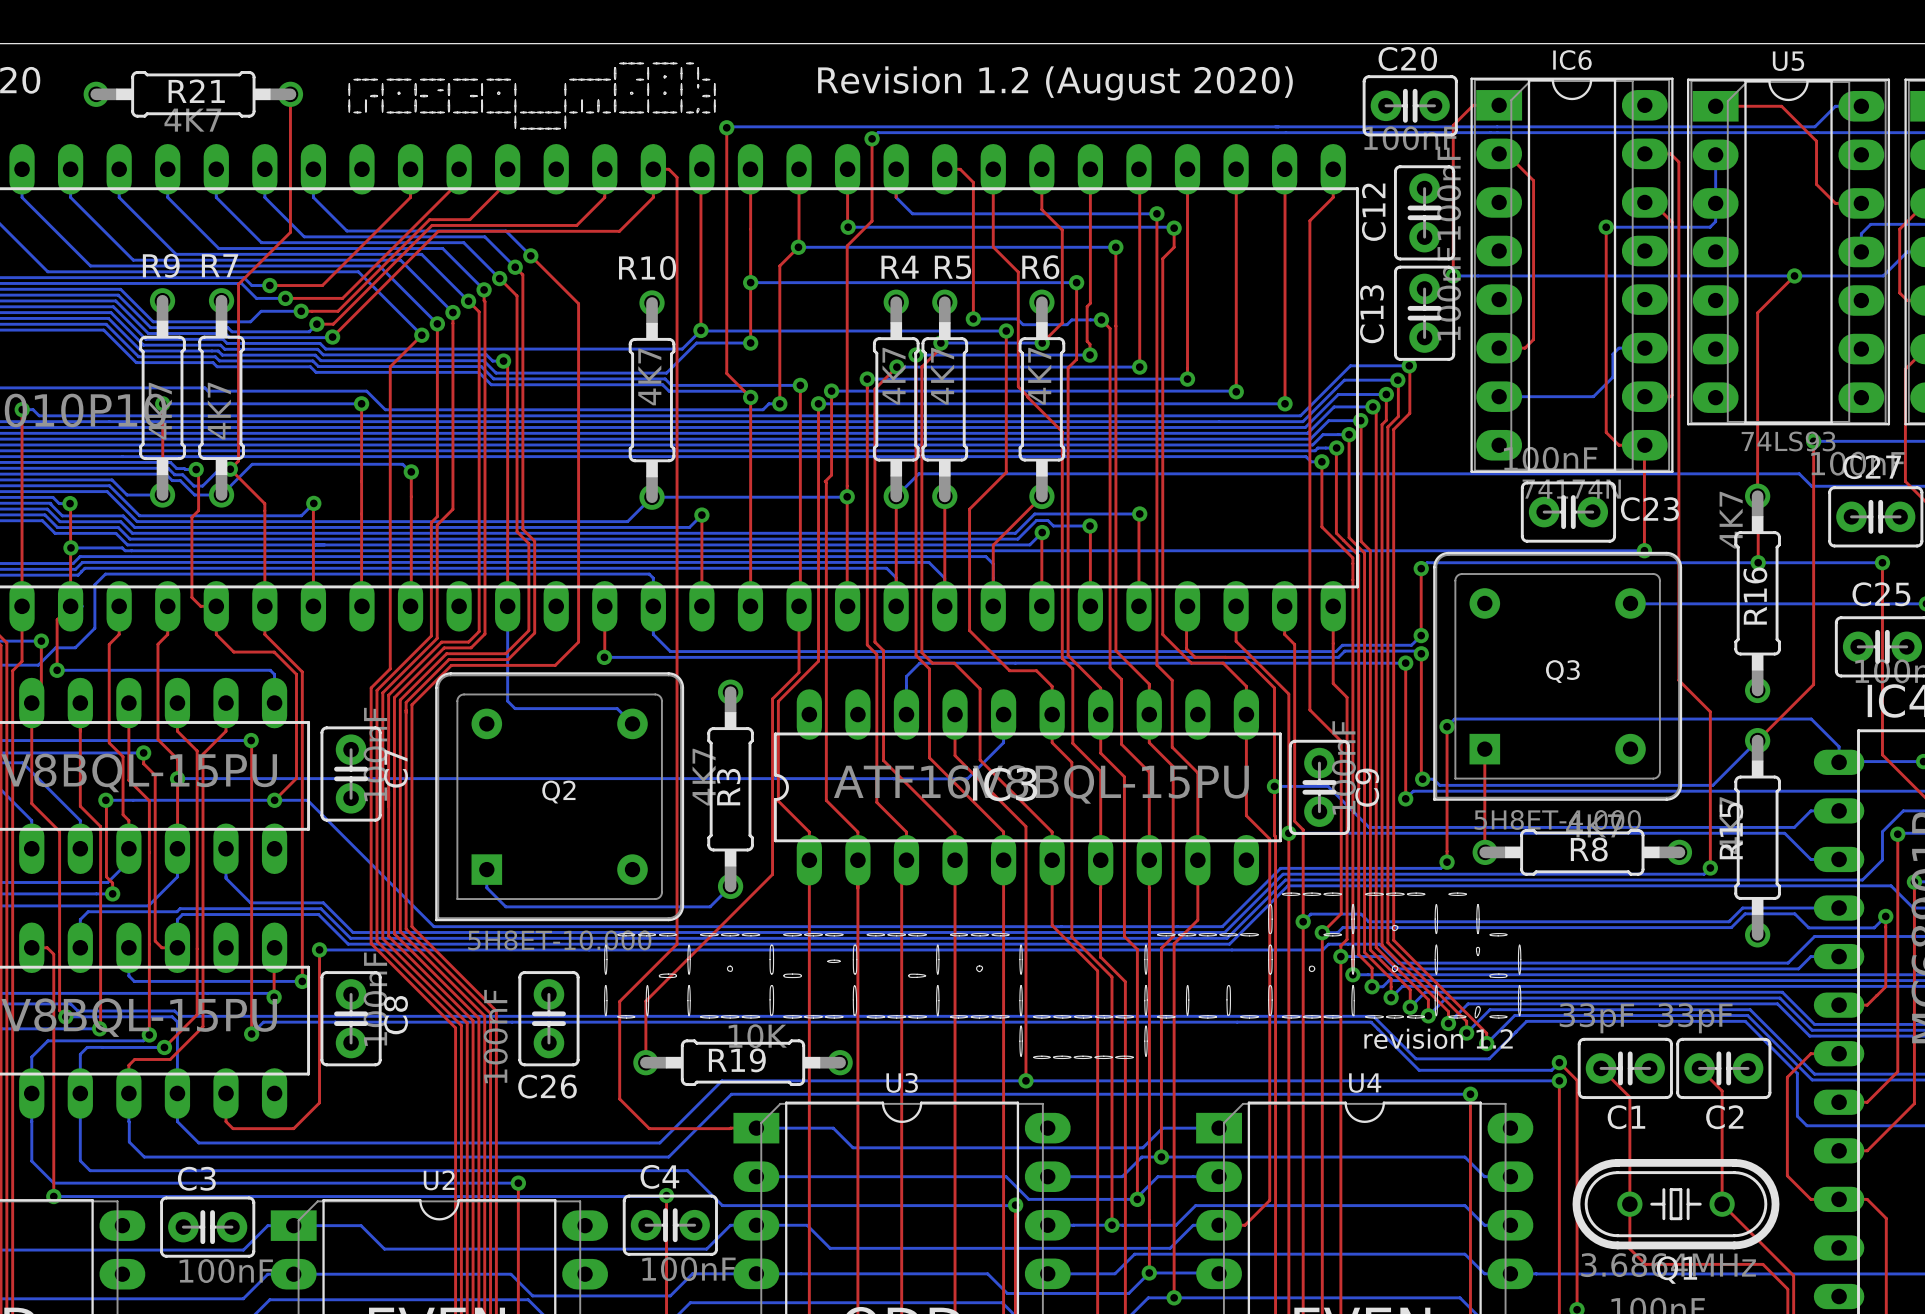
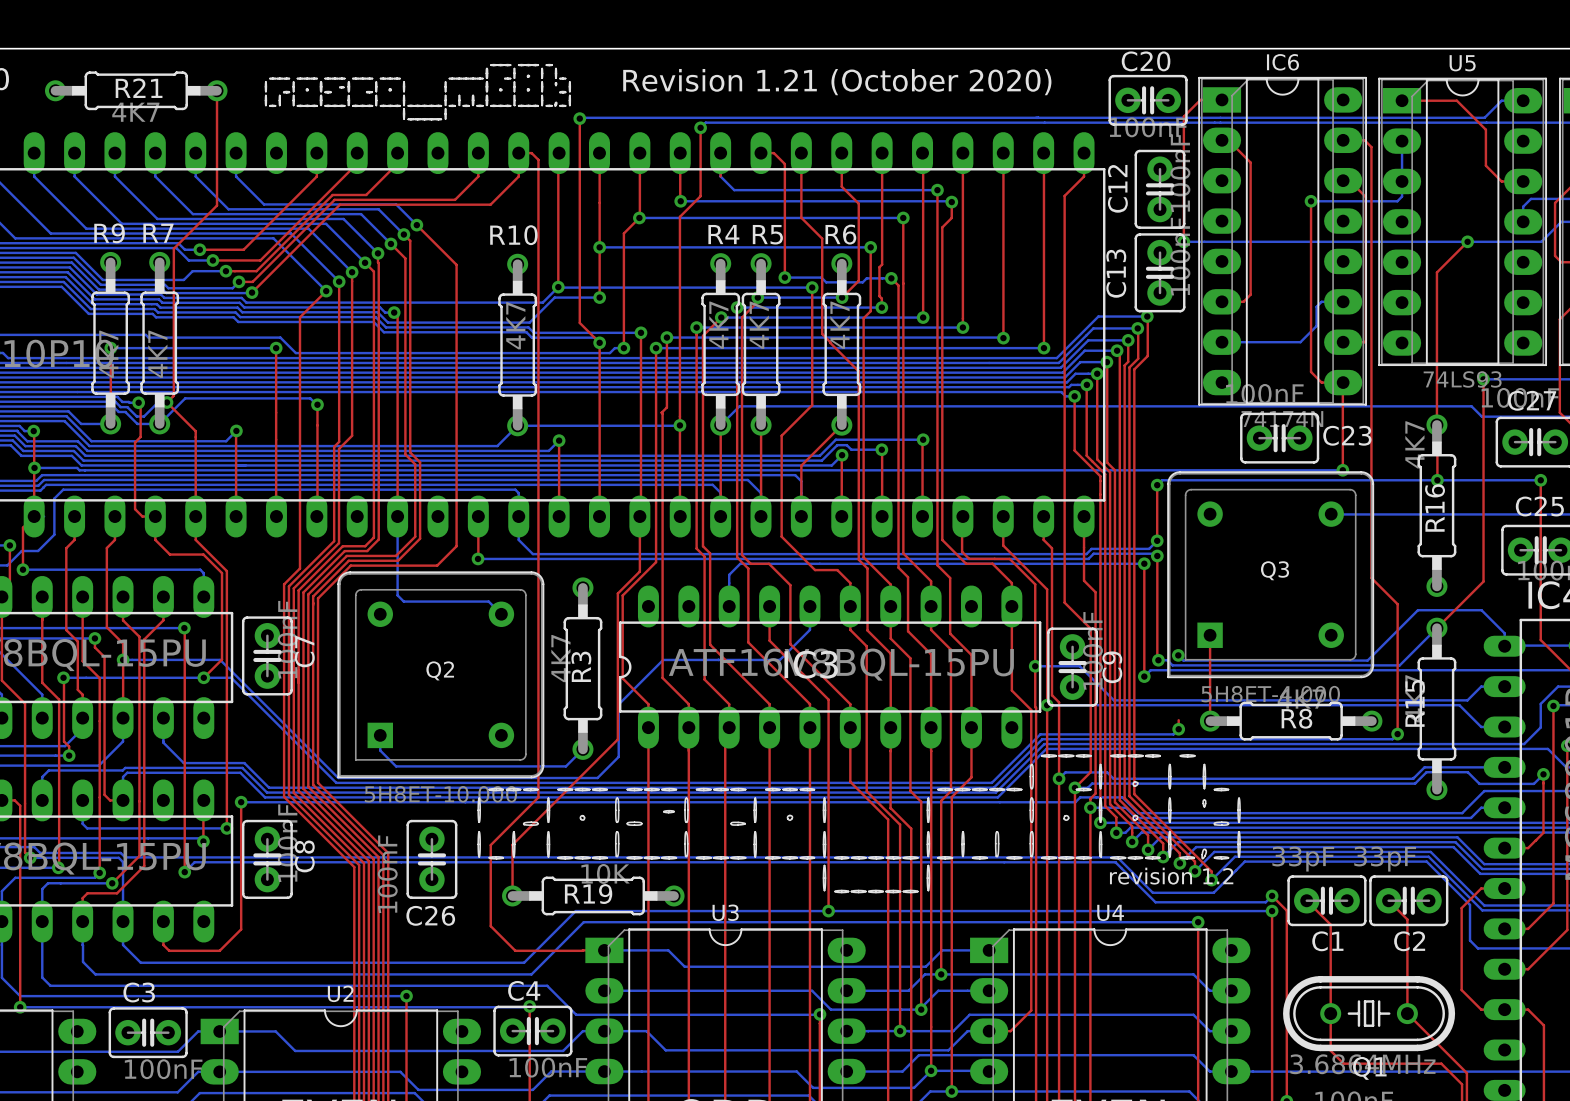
text: Revision 1.2 (August 2020) (1055, 83) -> Revision 1.21 (October 2020) (837, 82)
bottom track: (1734, 719) (1454, 719) (1447, 726) -> (1417, 610) (1367, 660) (1183, 660) (1178, 655)
top track: (1447, 726) (1447, 851) -> none
via position: (1447, 726) -> (1178, 655)
bottom track: (177, 778) (893, 778) -> (123, 659) (220, 659) (338, 778) (597, 778) (618, 756) (618, 704) (663, 659) (718, 659)

